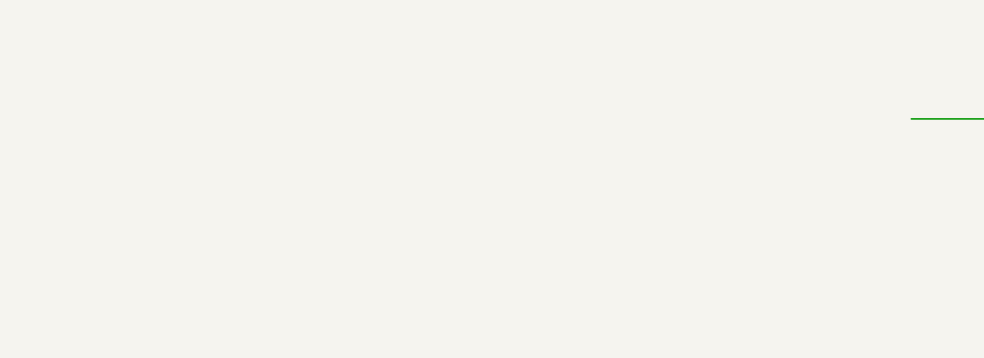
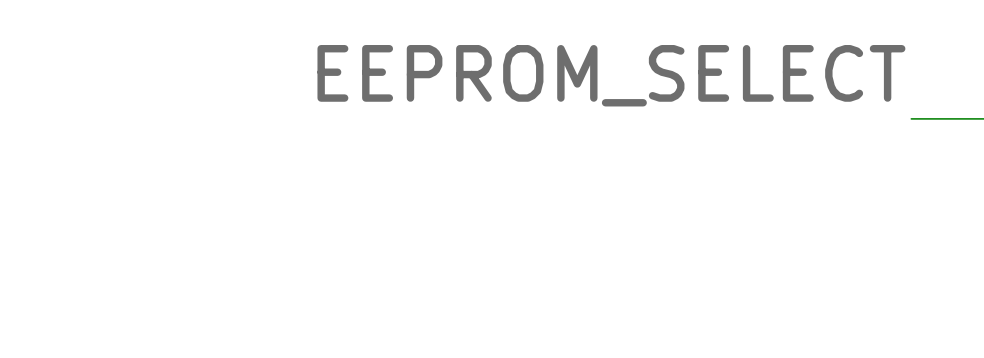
label: none -> EEPROM_SELECT (611, 75)

